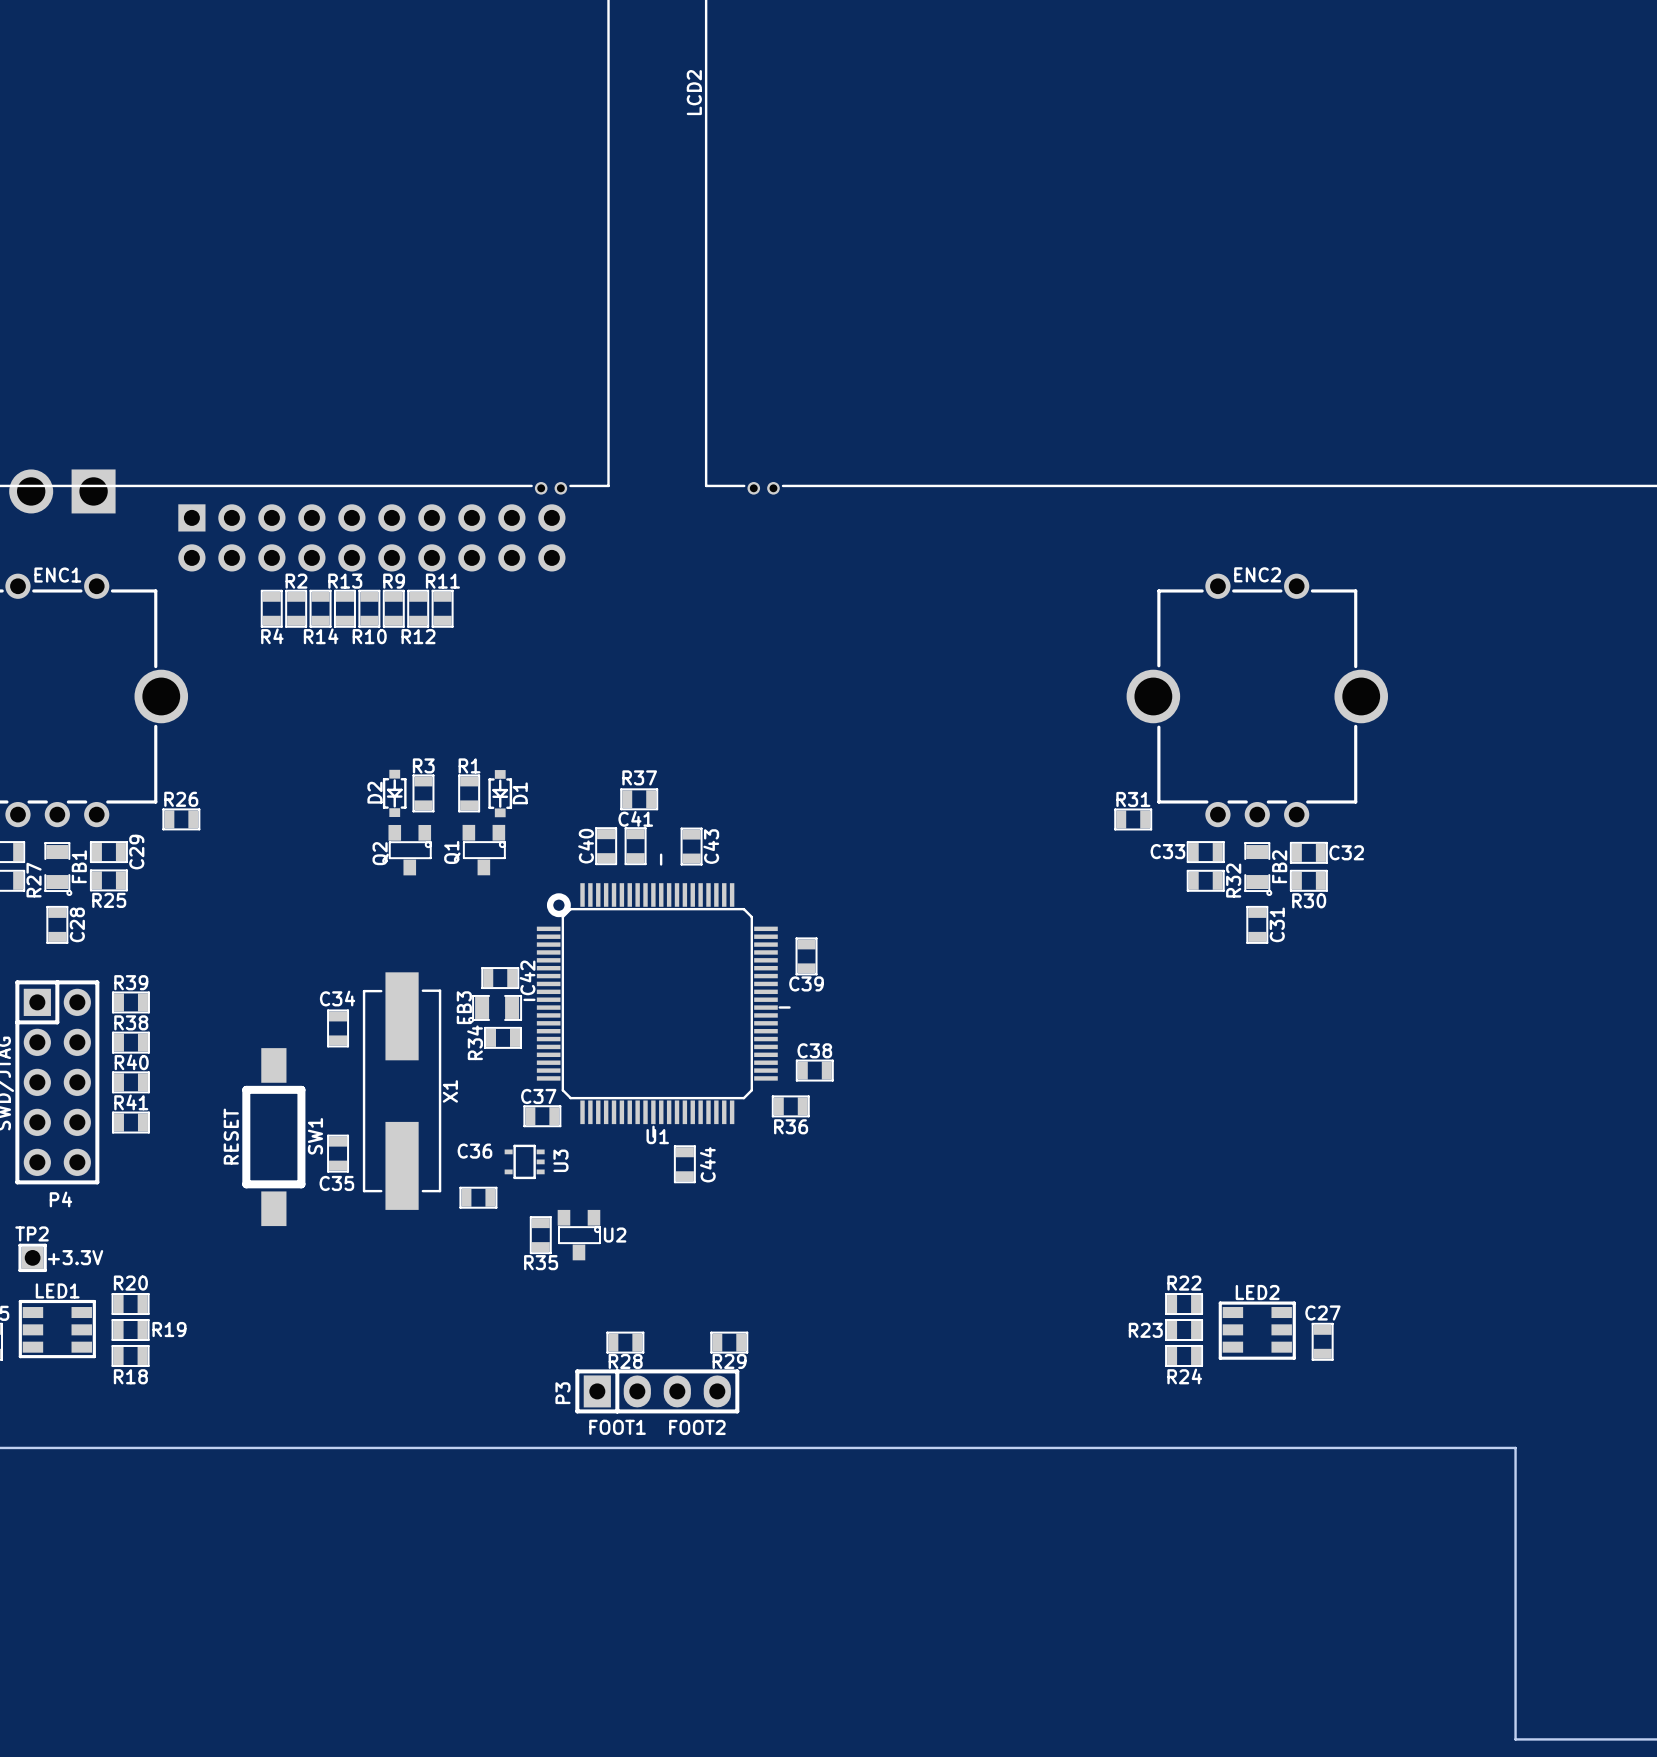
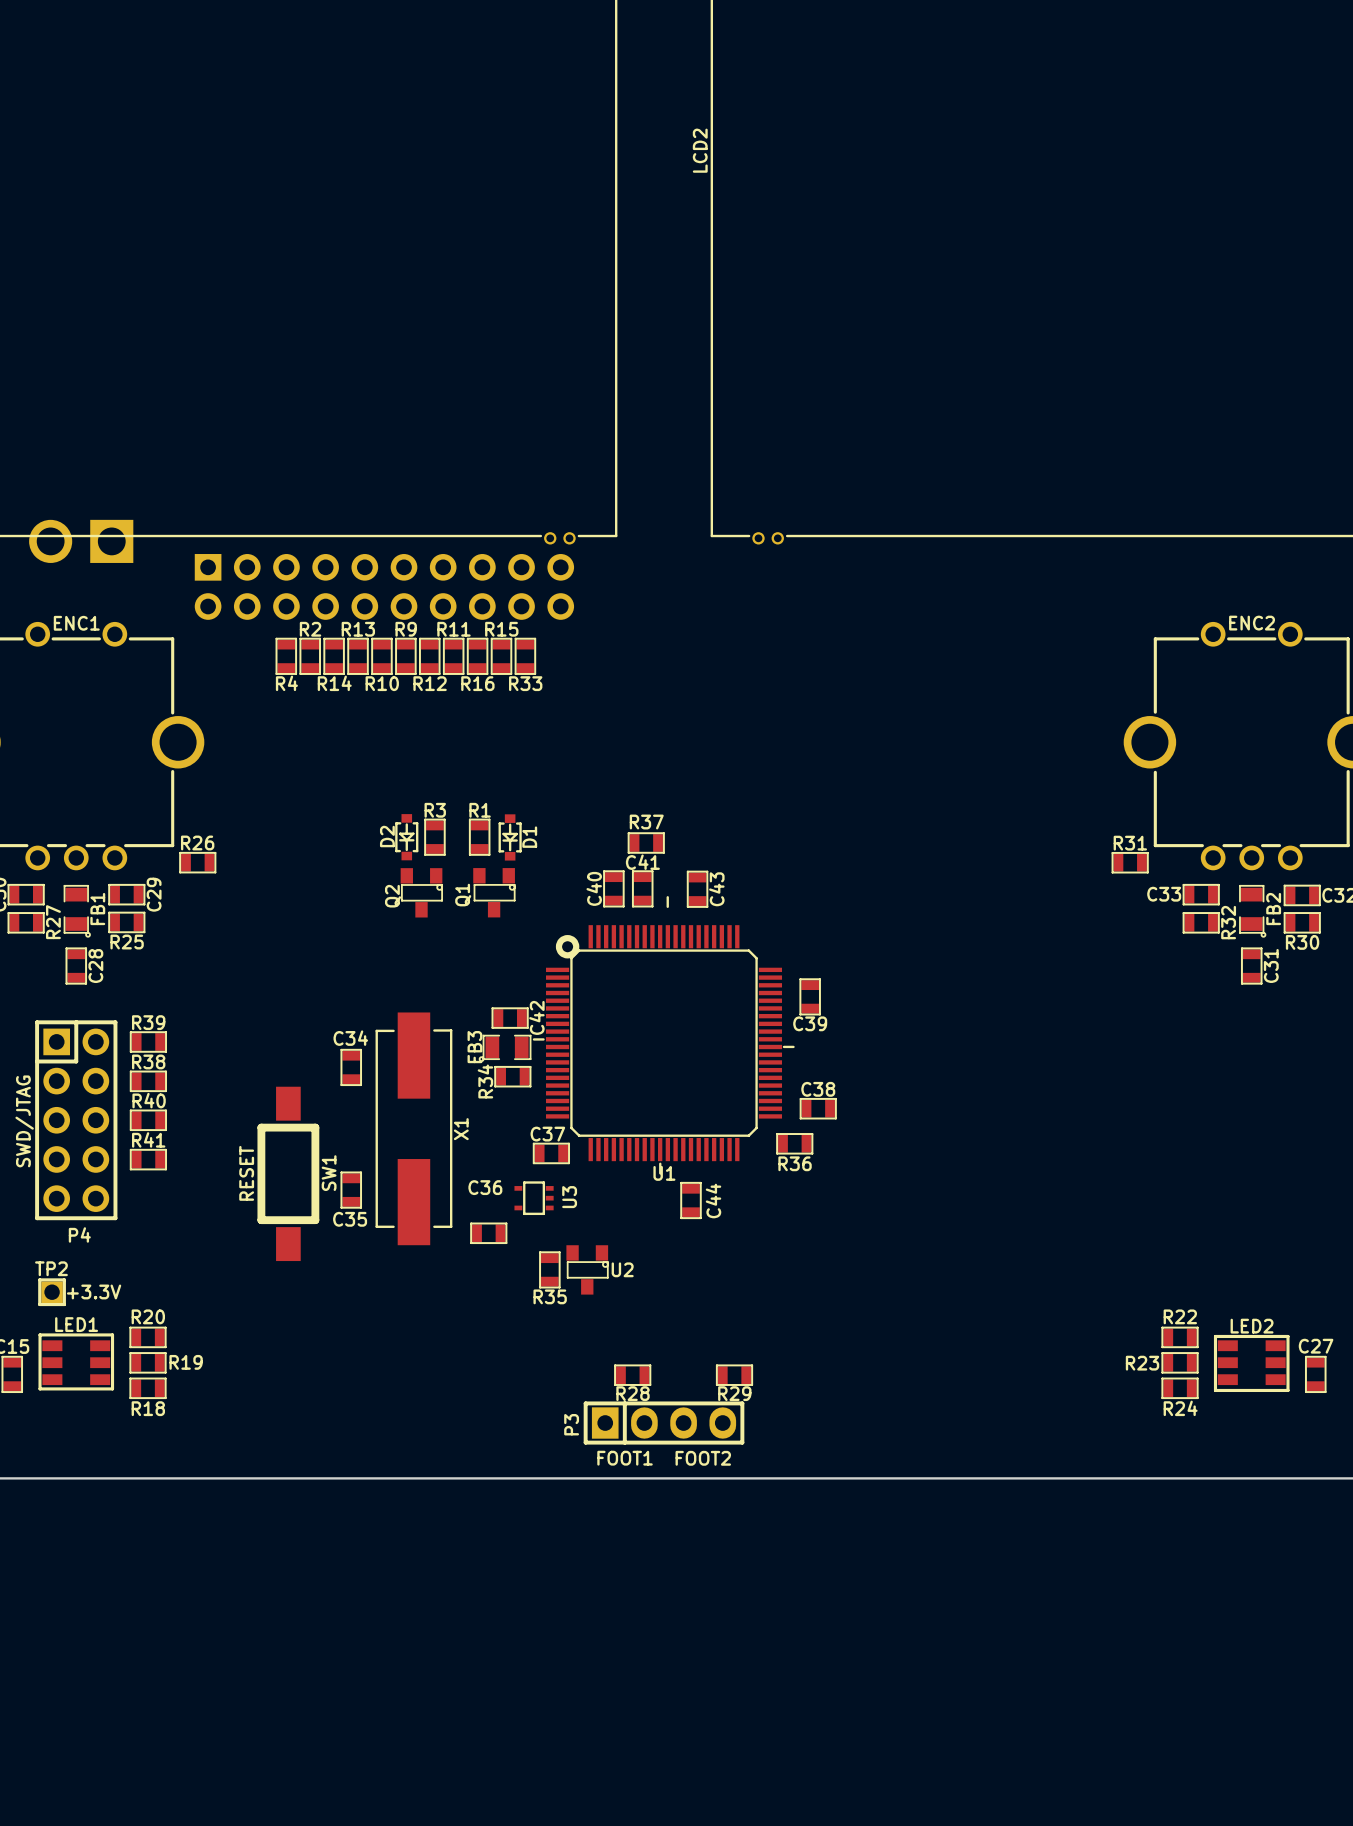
R16: none -> (477, 656)
R15: none -> (501, 656)
R33: none -> (525, 656)

